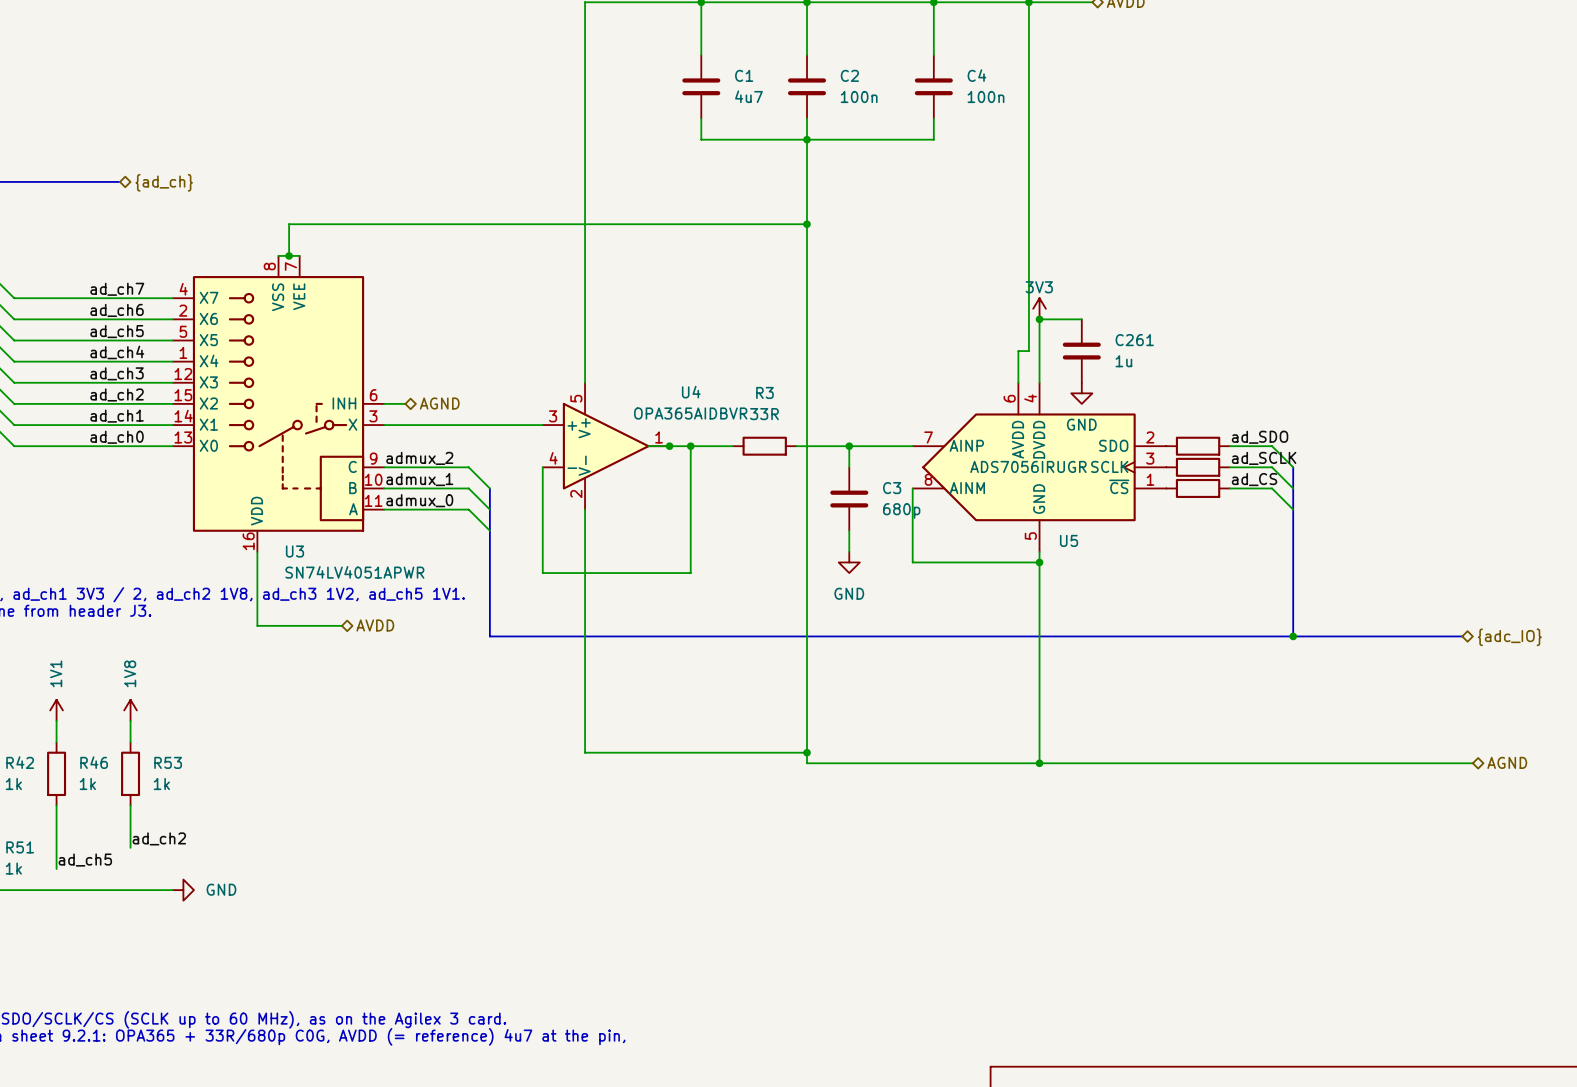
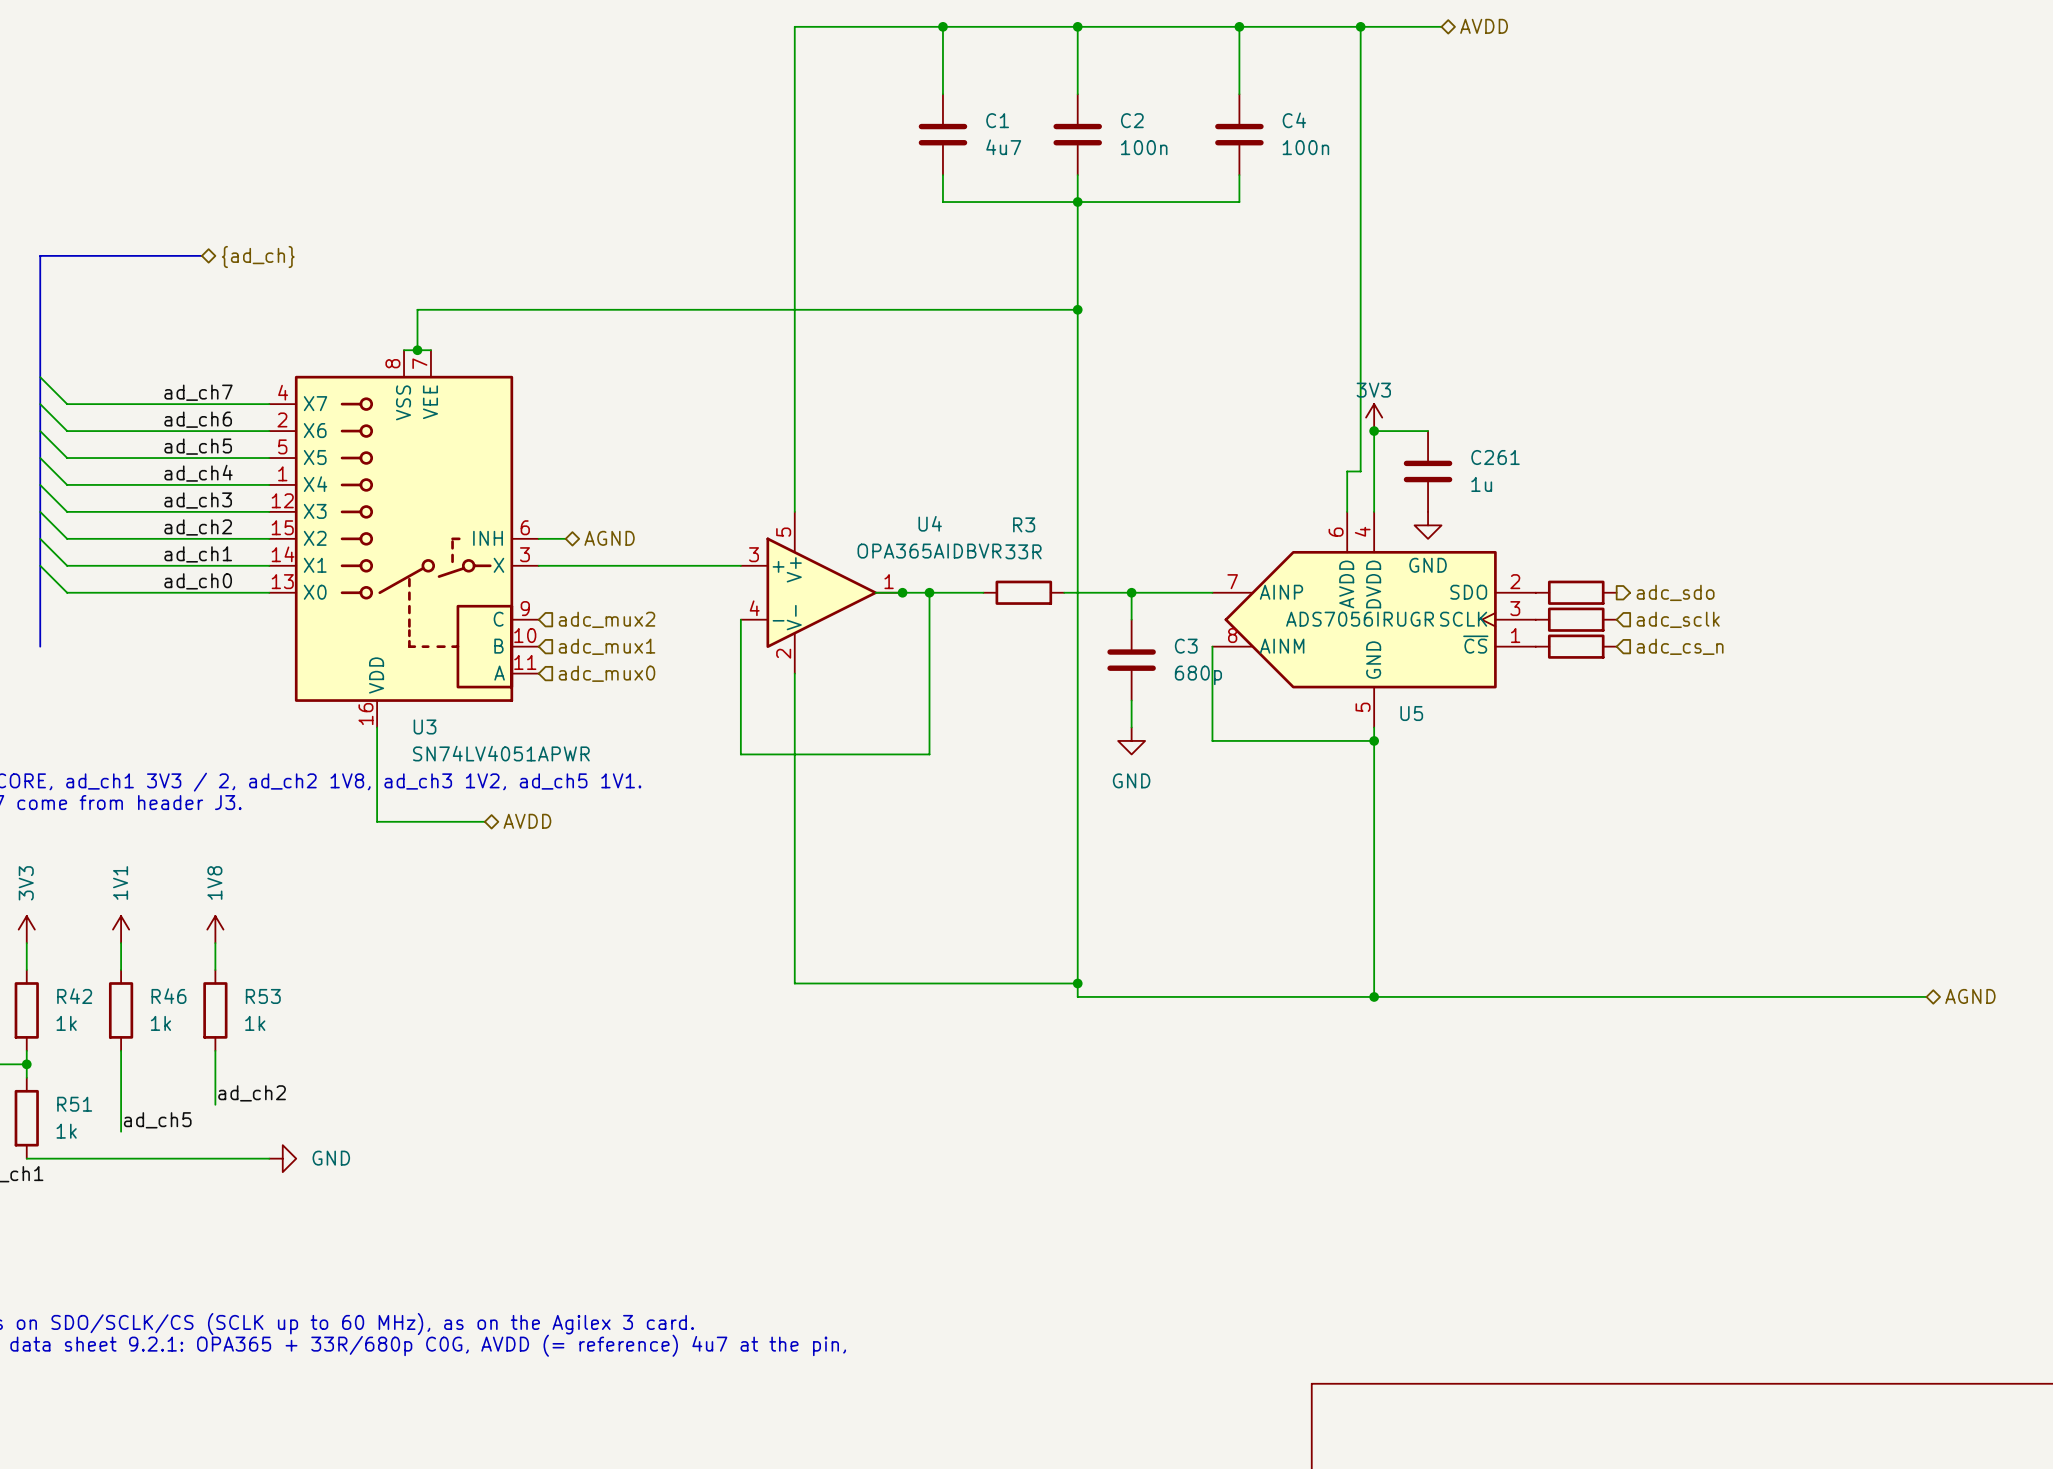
label: ad_SDO (1260, 437) -> none
wire: (1229, 446) (1272, 446) (1293, 467) -> none
hierarchical label: none -> adc_sdo (1675, 592)
label: admux_2 (419, 458) -> none
label: ad_SCLK (1264, 458) -> none
wire: (384, 467) (468, 467) (489, 488) -> none
hierarchical label: none -> adc_mux2 (606, 619)
wire: (1229, 467) (1272, 467) (1293, 488) -> none
hierarchical label: none -> adc_sclk (1678, 619)
bus: (1293, 467) (1293, 636) -> none
label: admux_1 (419, 479) -> none
label: ad_CS (1254, 479) -> none
wire: (384, 488) (468, 488) (489, 509) -> none
hierarchical label: none -> adc_mux1 (606, 646)
bus: (489, 488) (489, 636) (1462, 636) -> none
wire: (1229, 488) (1272, 488) (1293, 509) -> none
hierarchical label: none -> adc_cs_n (1680, 646)
label: admux_0 (419, 500) -> none
wire: (384, 509) (468, 509) (489, 530) -> none
hierarchical label: none -> adc_mux0 (606, 673)
junction: (1293, 636) -> none
hierarchical label: {adc_IO} (1509, 637) -> none

